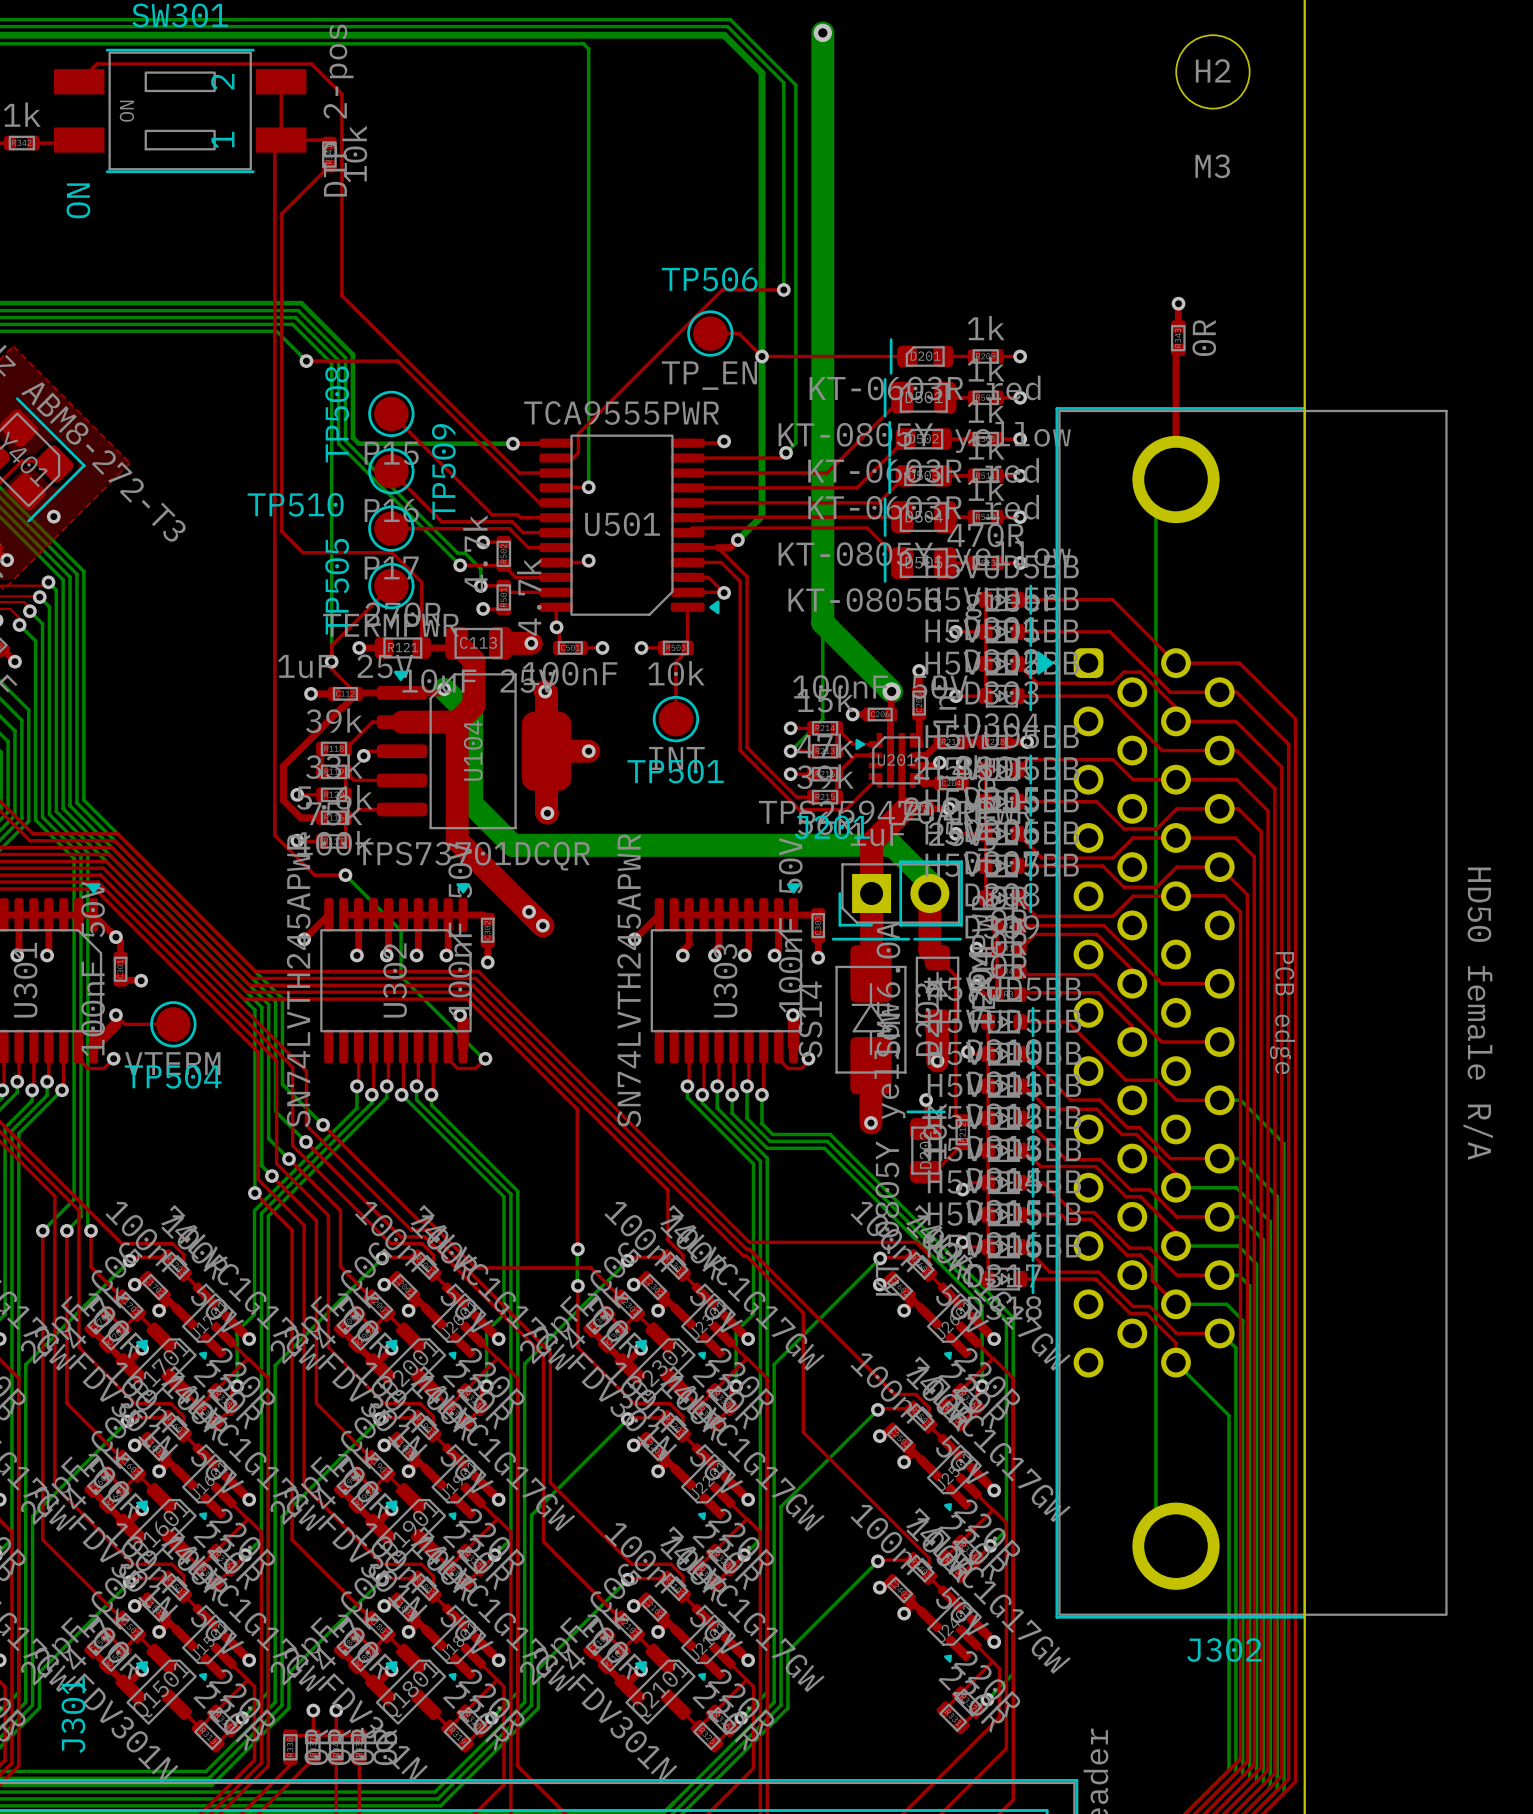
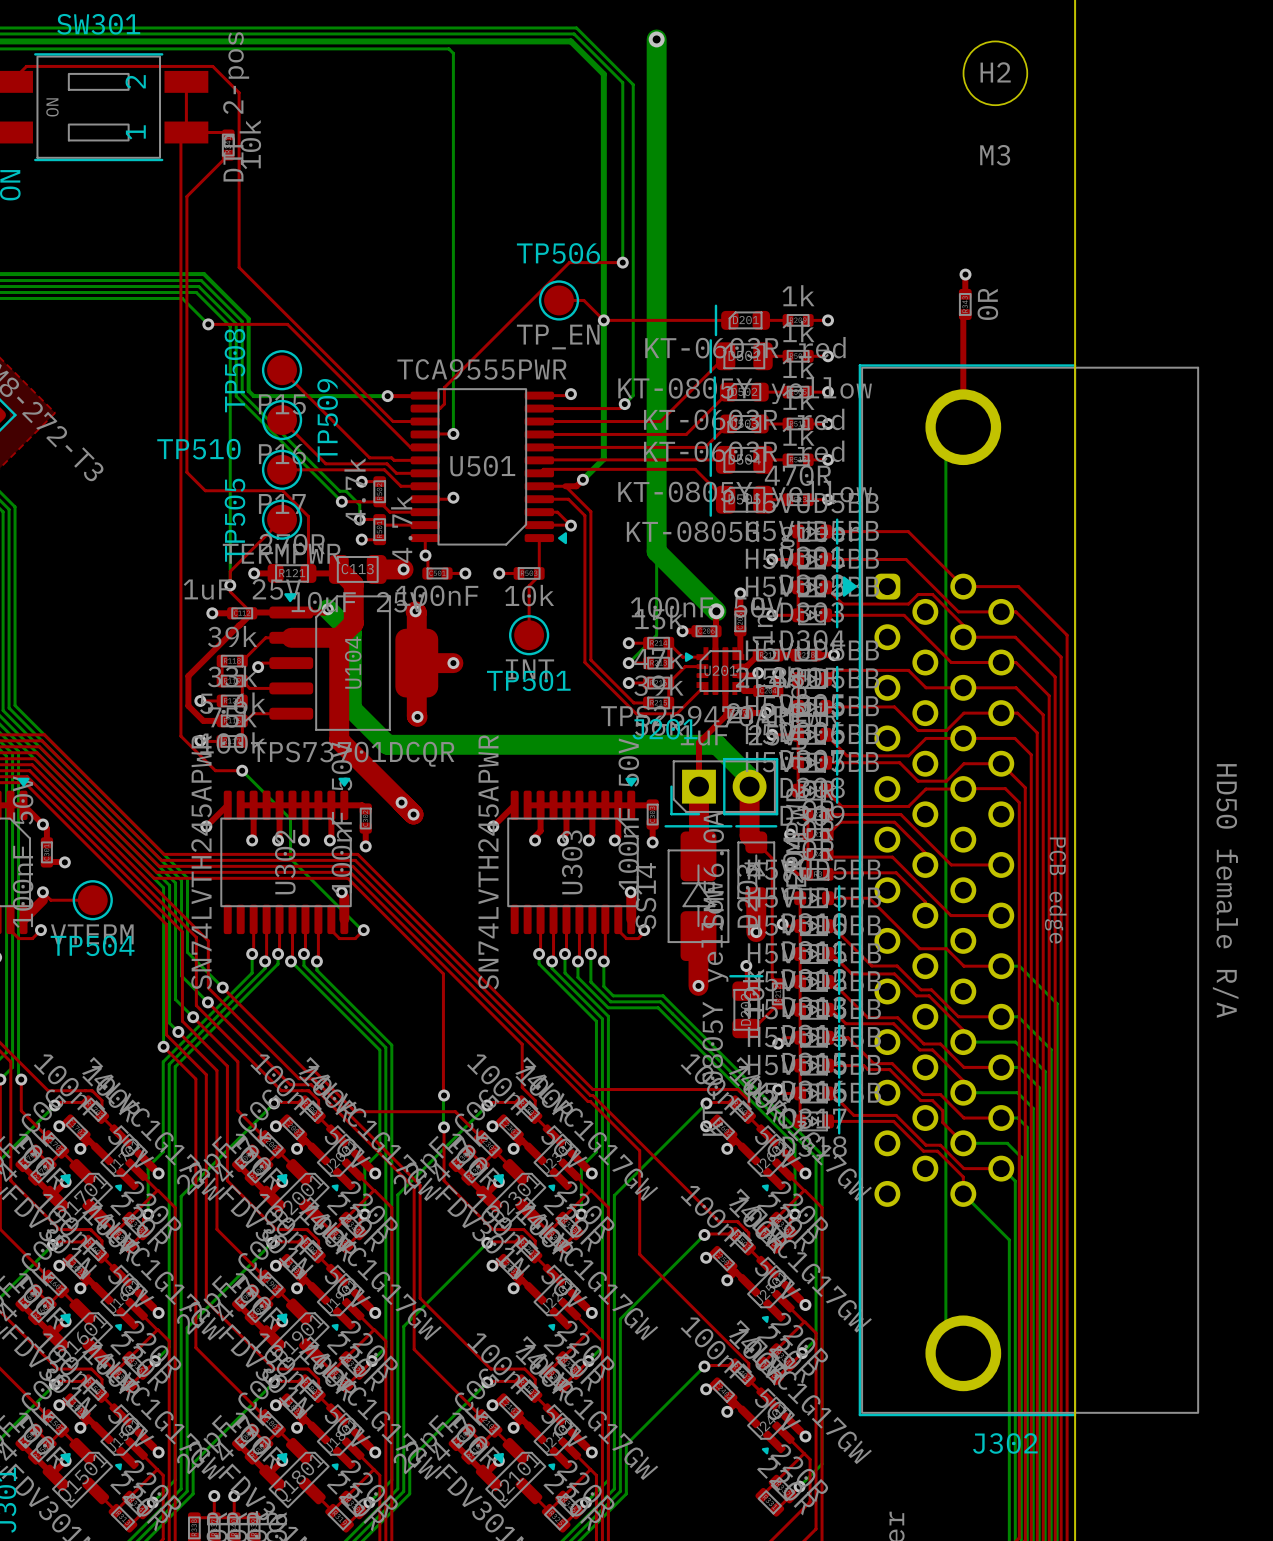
top track width: thick (905, 808) (871, 842) (871, 893) -> thin (728, 712) (698, 742) (698, 786)

